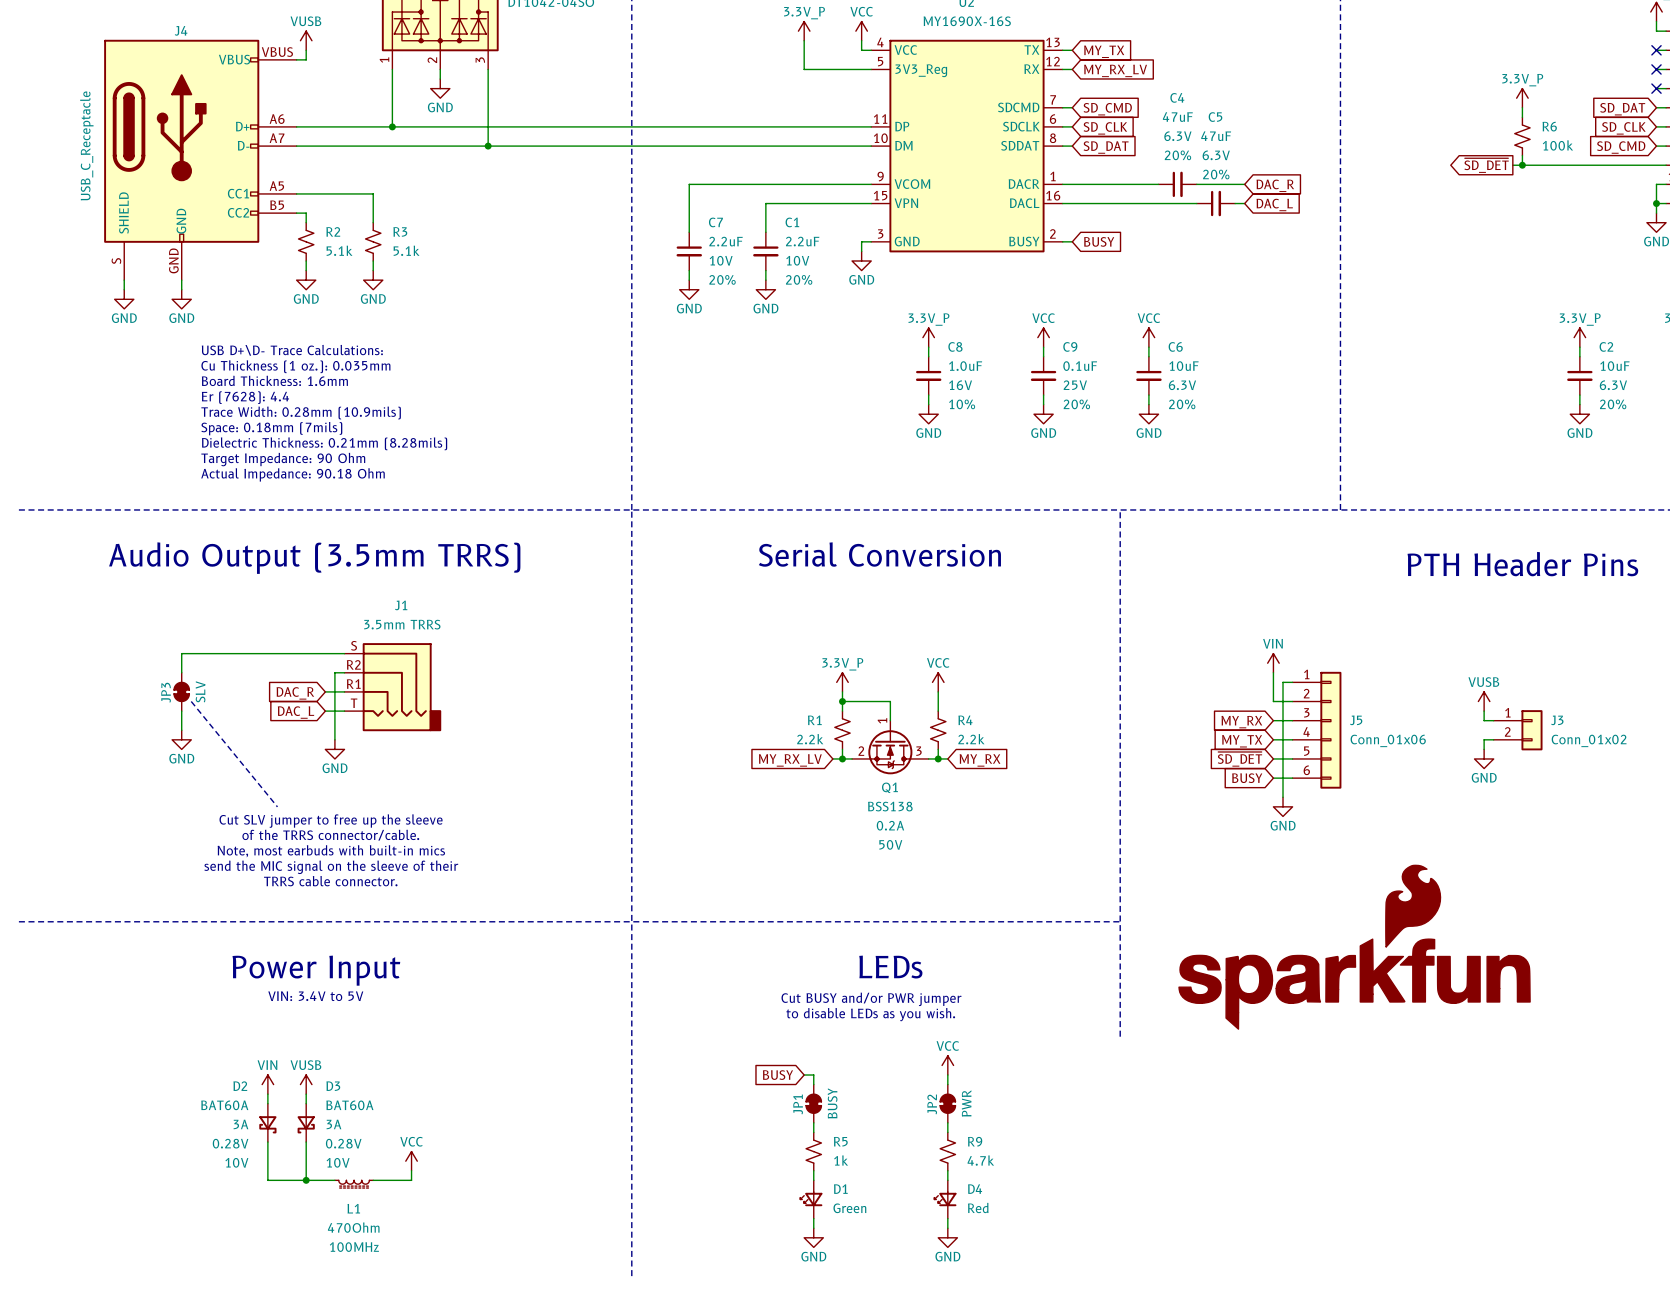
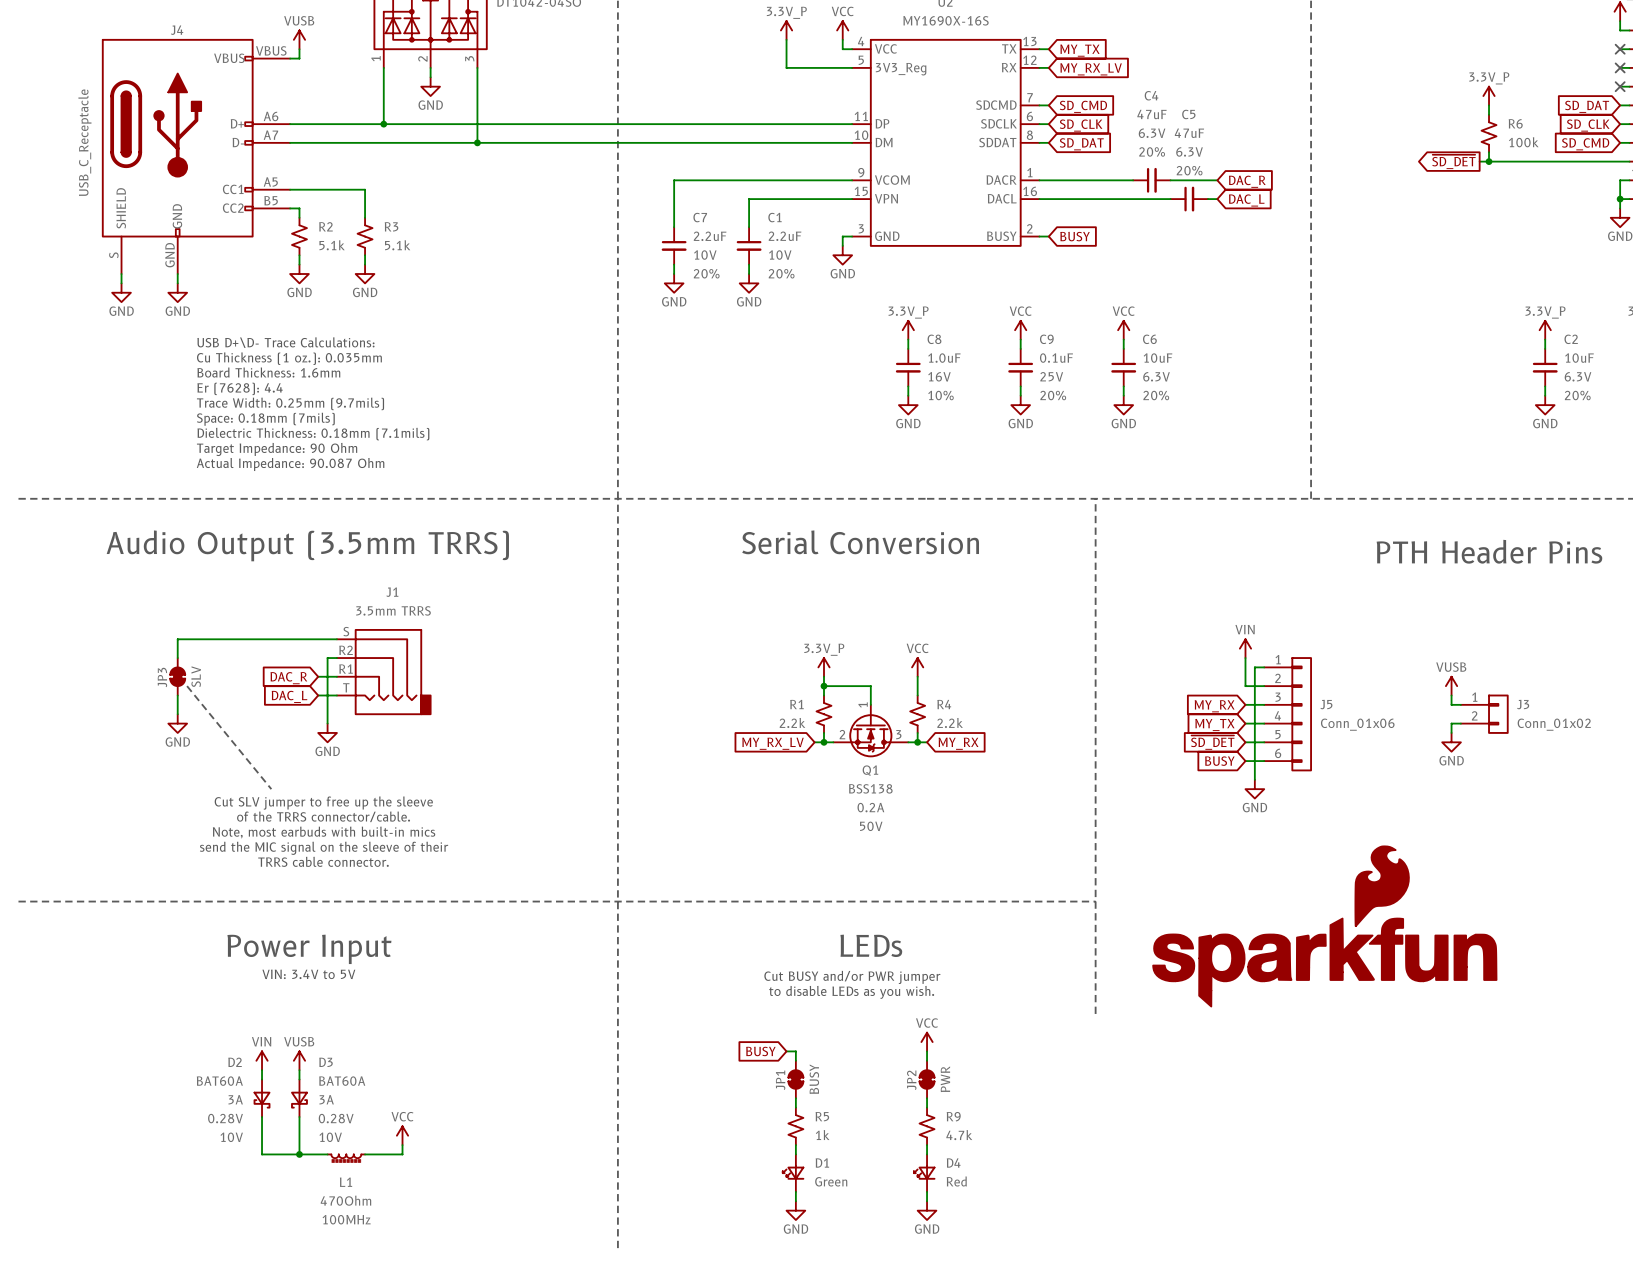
text: Trace Width: 0.28mm (10.9mils) (301, 412) -> Trace Width: 0.25mm (9.7mils) (290, 403)
text: Dielectric Thickness: 0.21mm (8.28mils) (324, 443) -> Dielectric Thickness: 0.18mm (7.1mils) (313, 434)
text: Actual Impedance: 90.18 Ohm (293, 474) -> Actual Impedance: 90.087 Ohm (290, 464)

